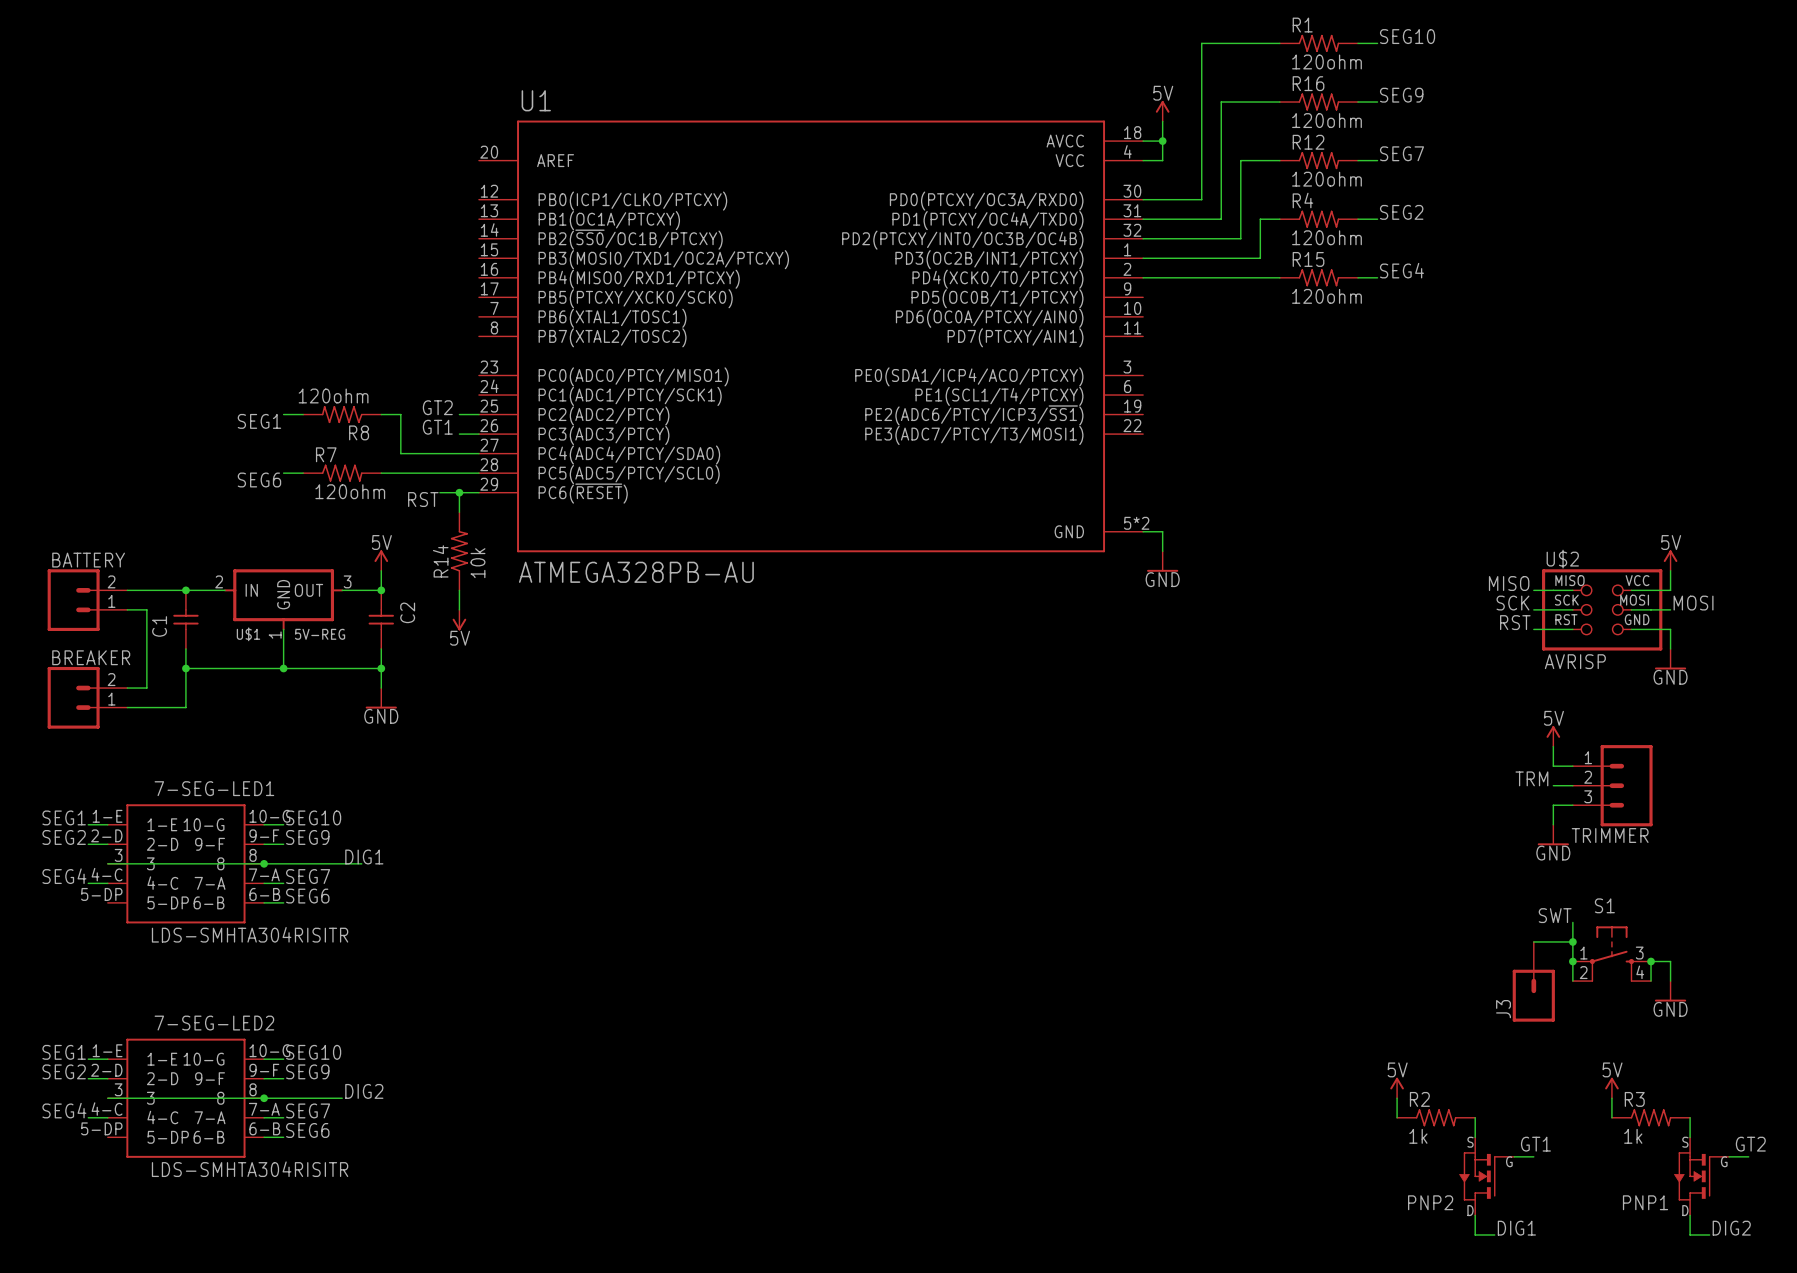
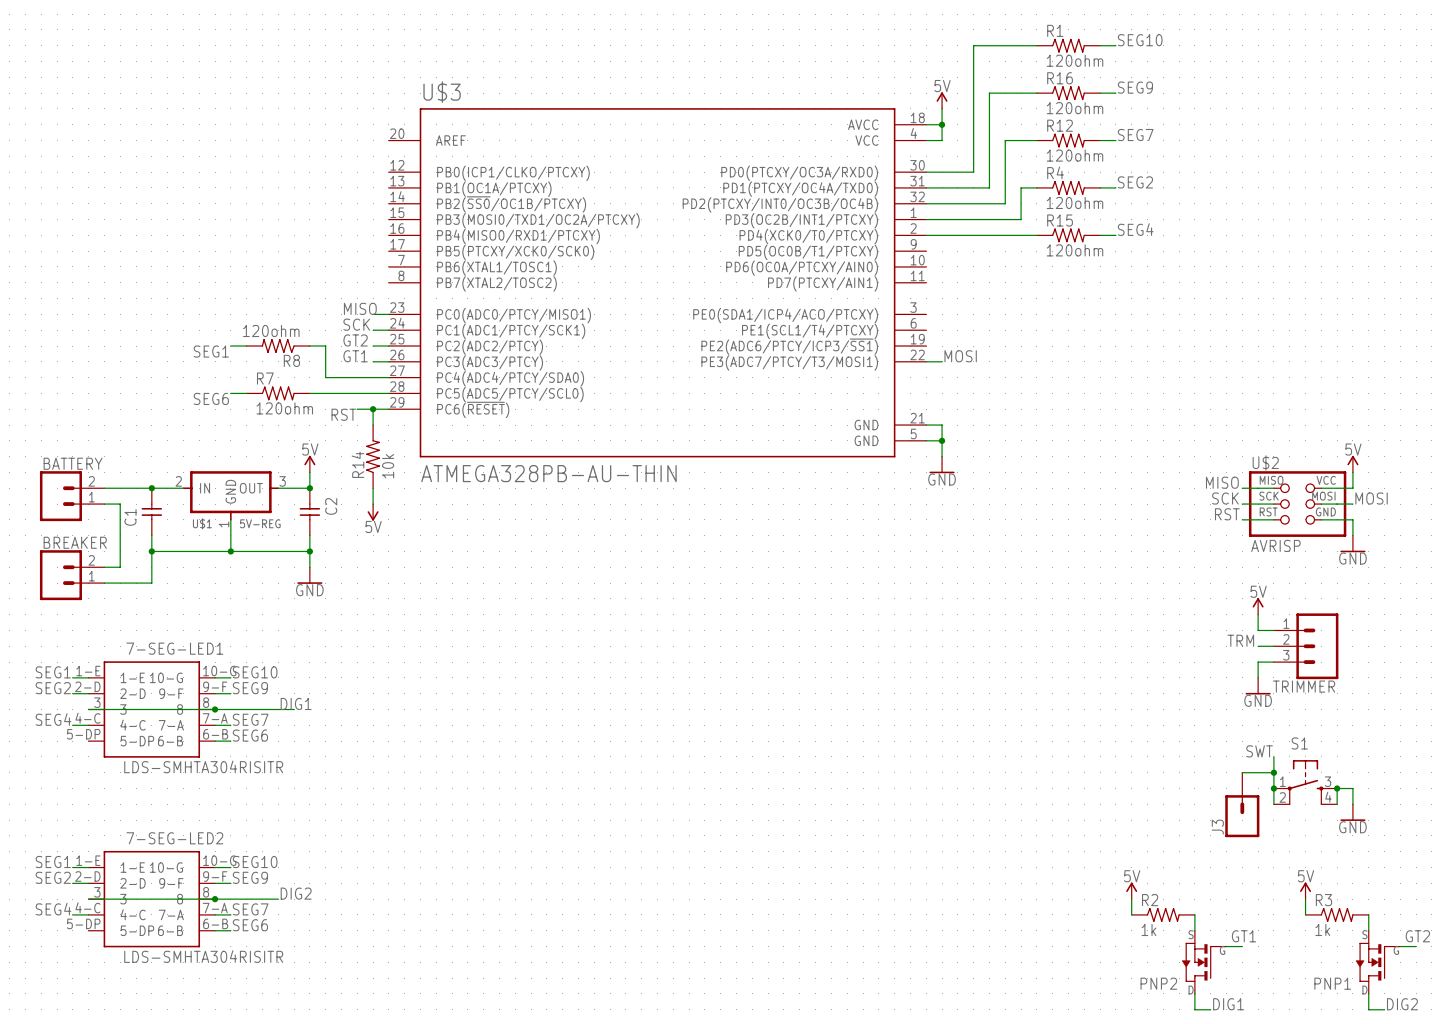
U1: ATMEGA328PB-AU (811, 336) -> none
U$3: none -> ATMEGA328PB-AU-THIN (657, 282)
label: none -> MISO (360, 308)
wire: none -> (373, 314) (388, 314)
label: none -> SCK (356, 324)
wire: none -> (373, 330) (388, 330)
label: none -> MOSI (960, 356)
wire: none -> (926, 361) (942, 361)
wire: none -> (926, 425) (942, 425) (942, 440)
junction: none -> (942, 440)

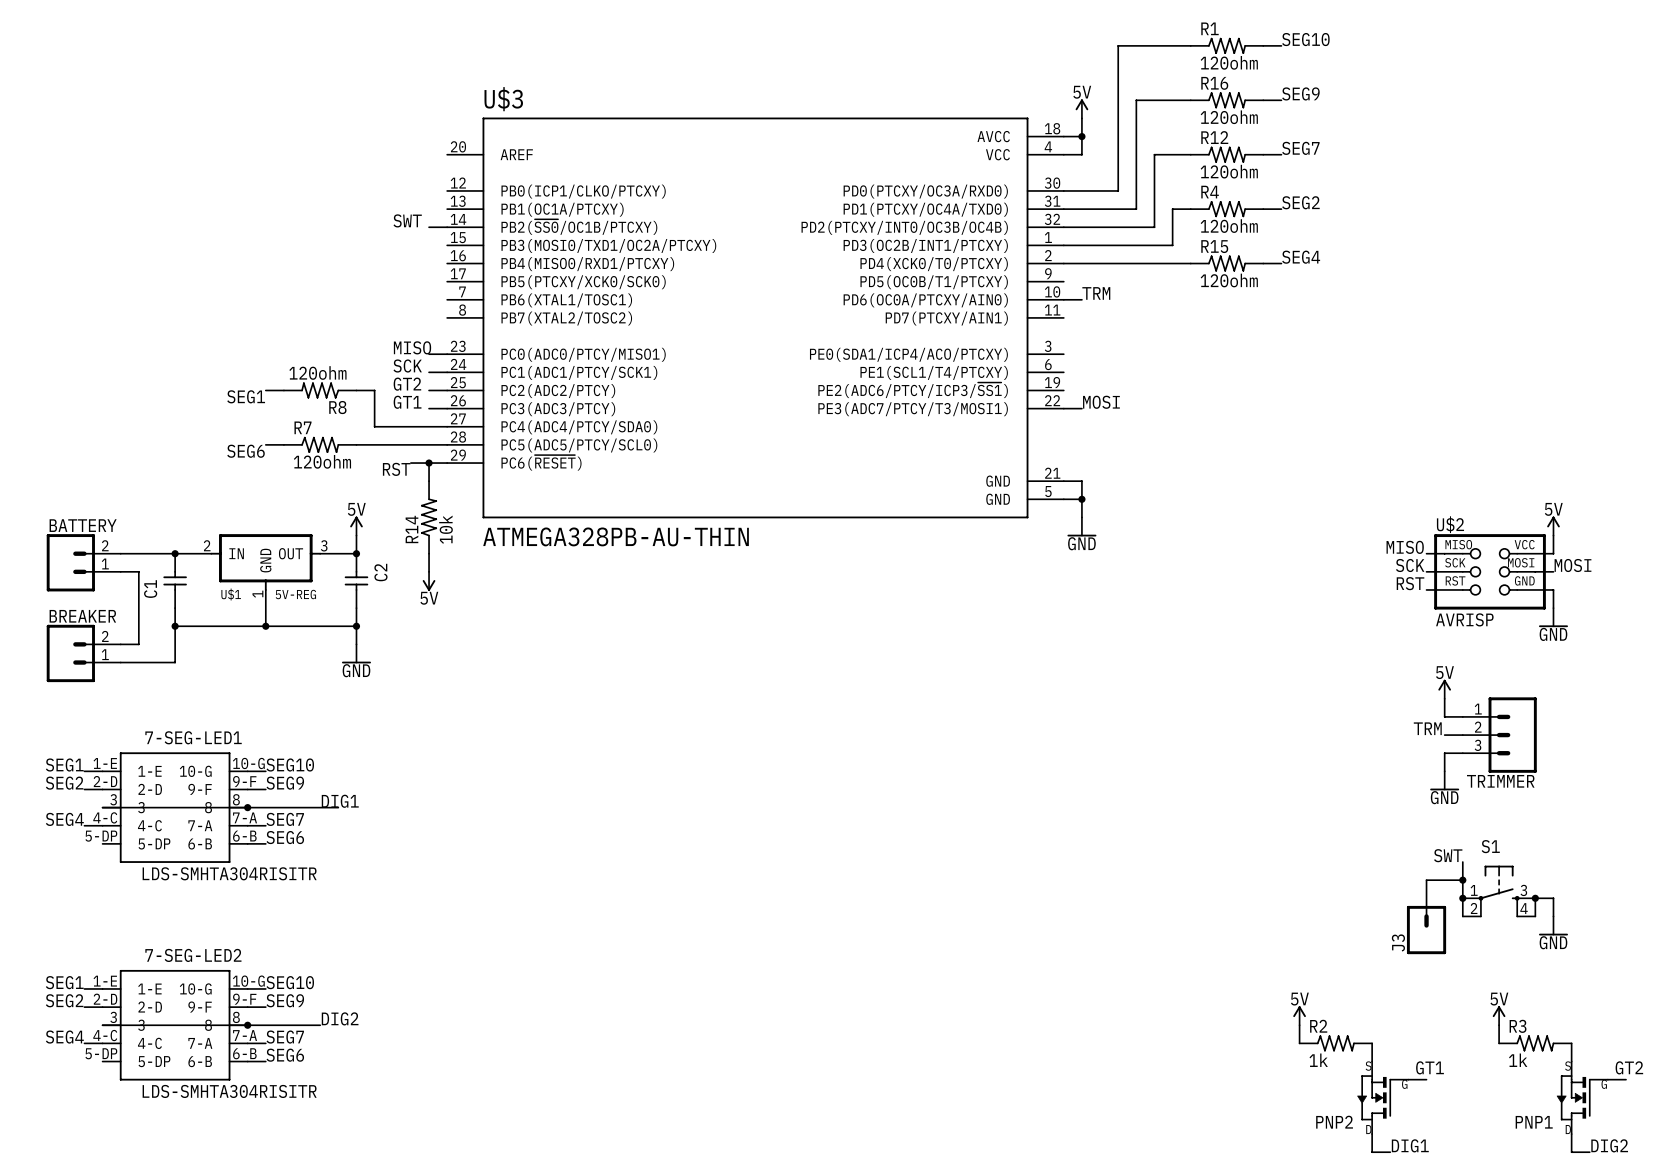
label: none -> SWT (407, 220)
wire: none -> (429, 227) (447, 227)
label: none -> TRM (1096, 293)
wire: none -> (1063, 299) (1081, 299)

